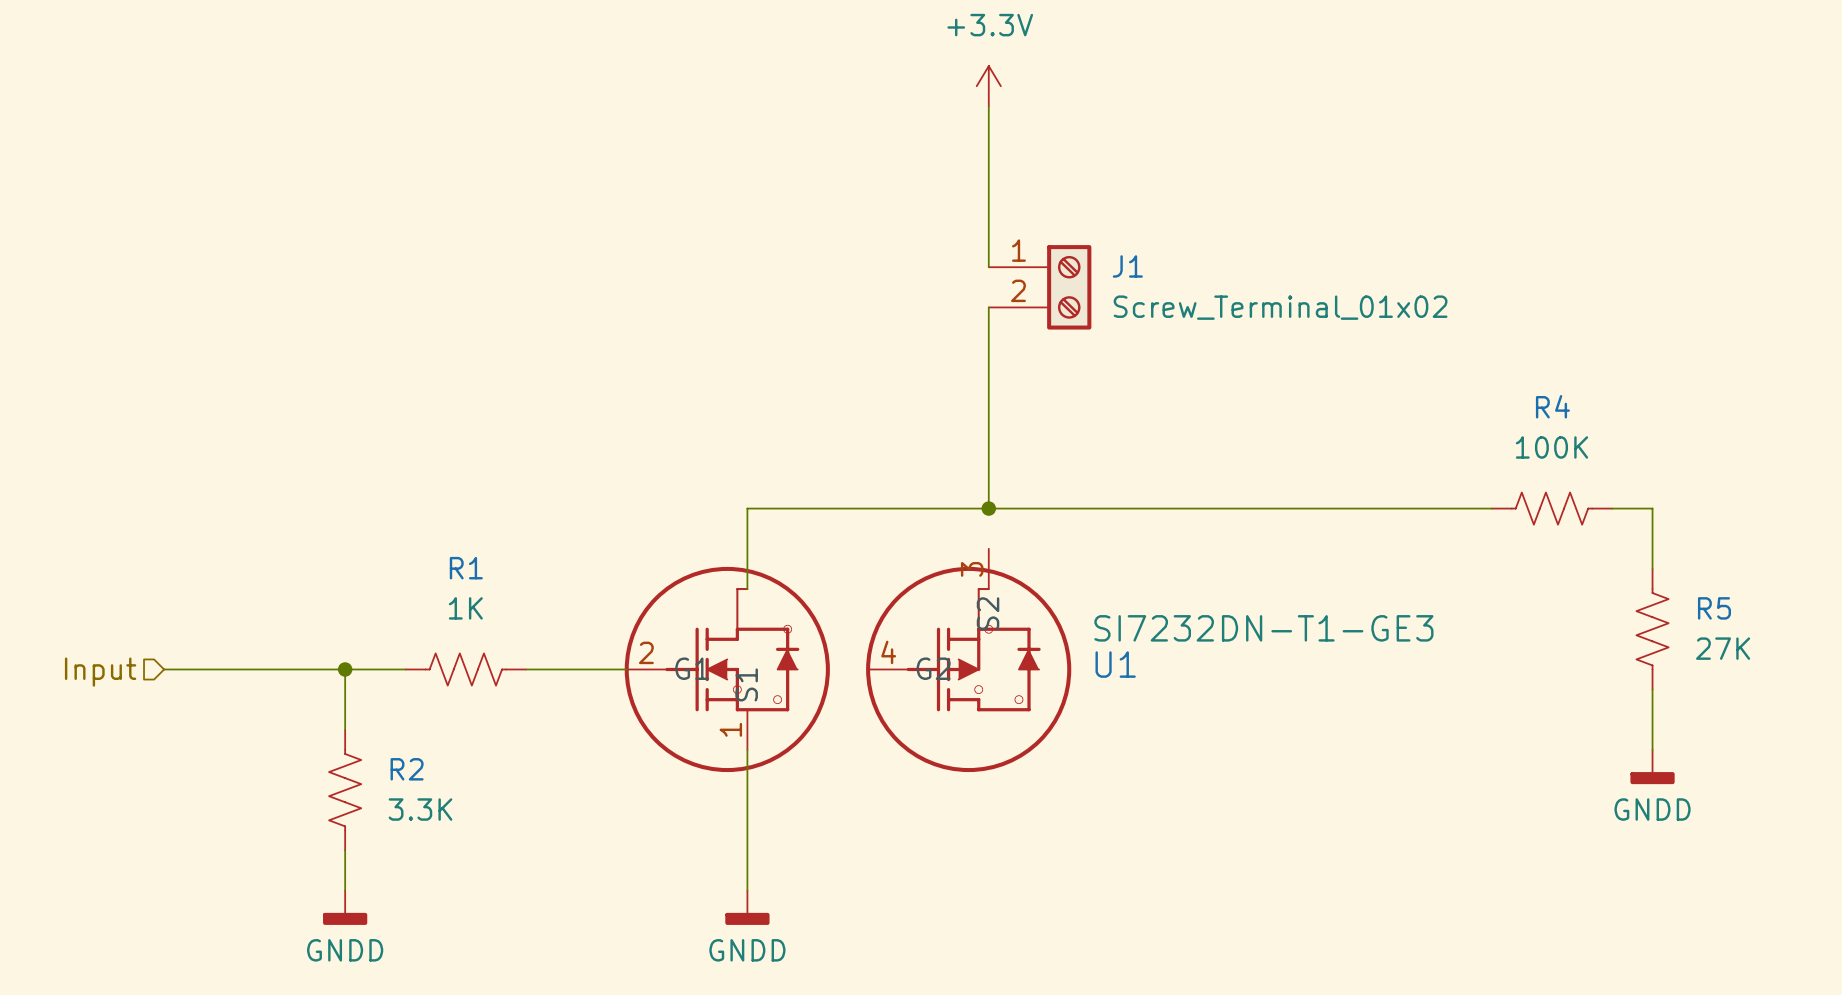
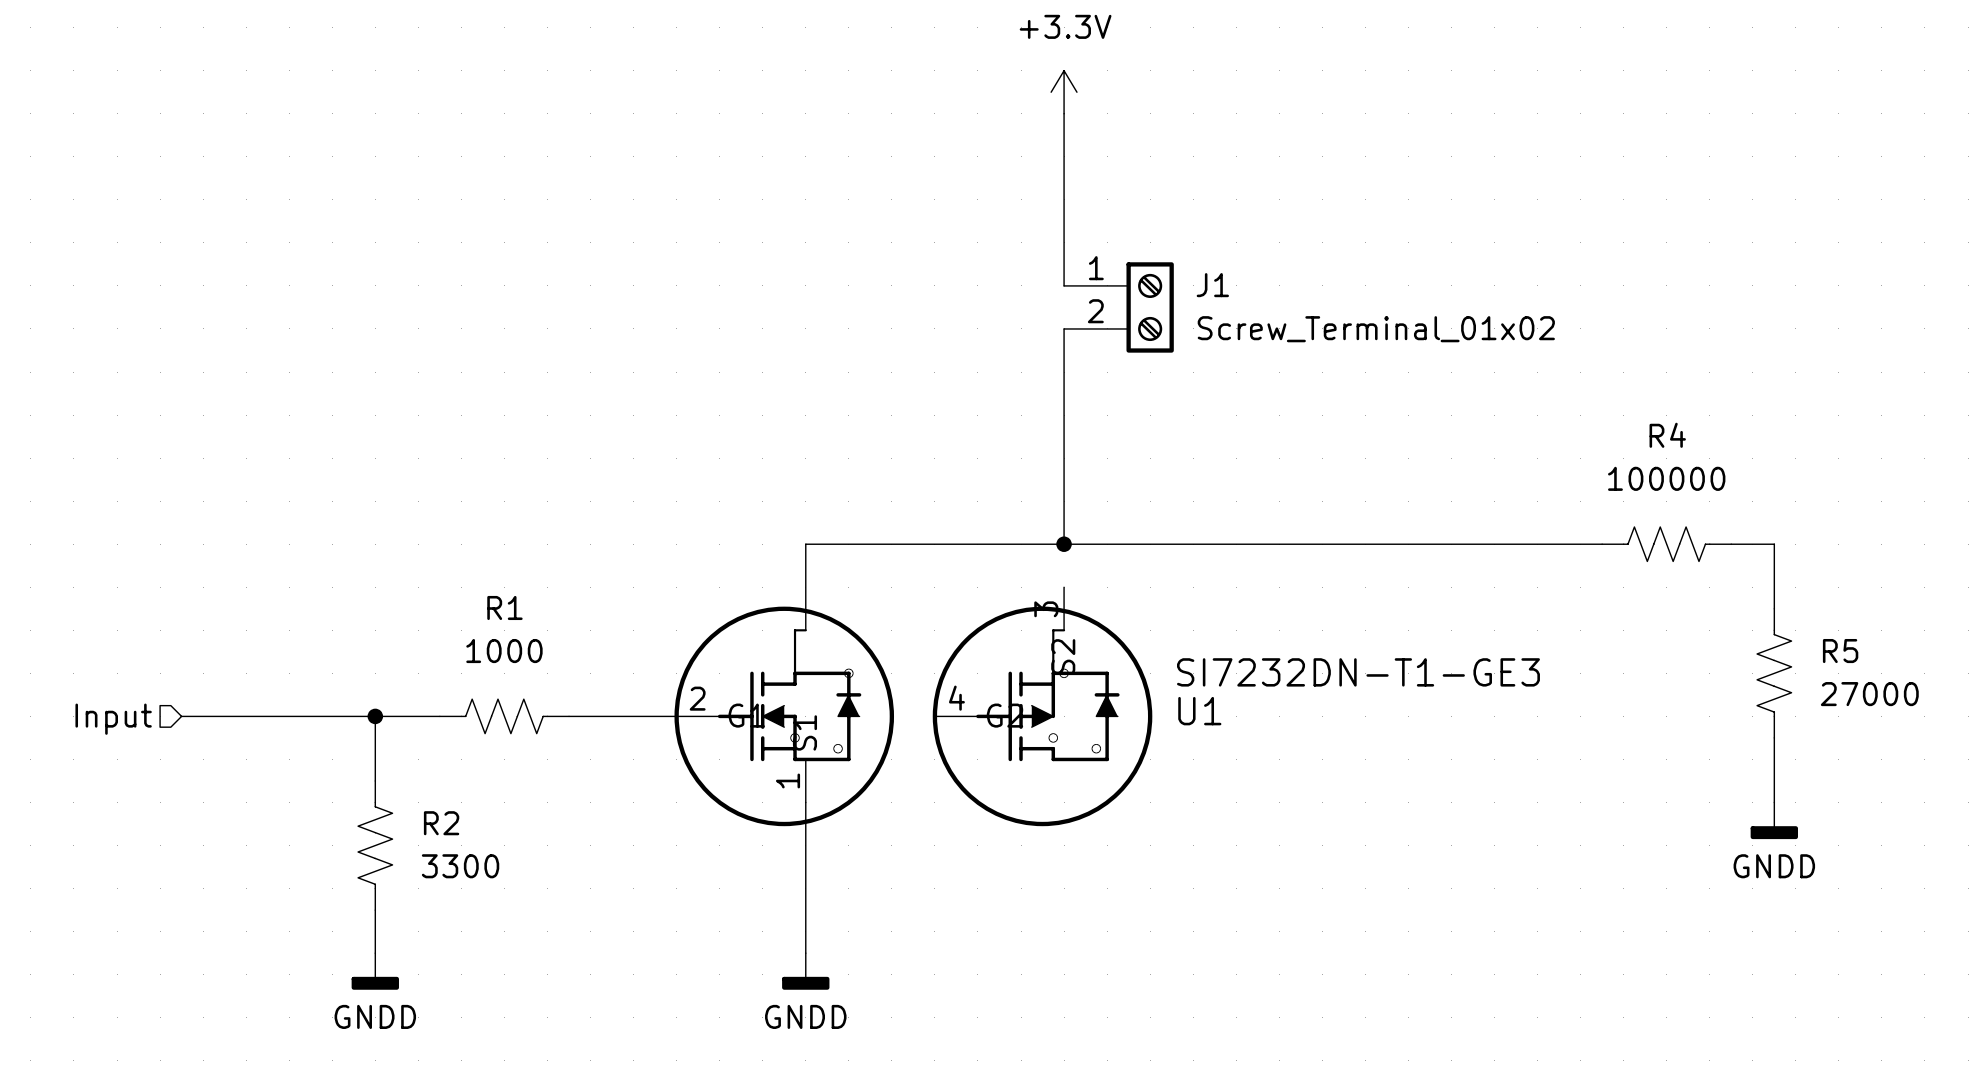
R4 value: 100K (1551, 447) -> 100000 (1666, 478)
R1 value: 1K (465, 608) -> 1000 (504, 651)
R5 value: 27K (1723, 648) -> 27000 (1869, 694)
R2 value: 3.3K (420, 809) -> 3300 (460, 866)

